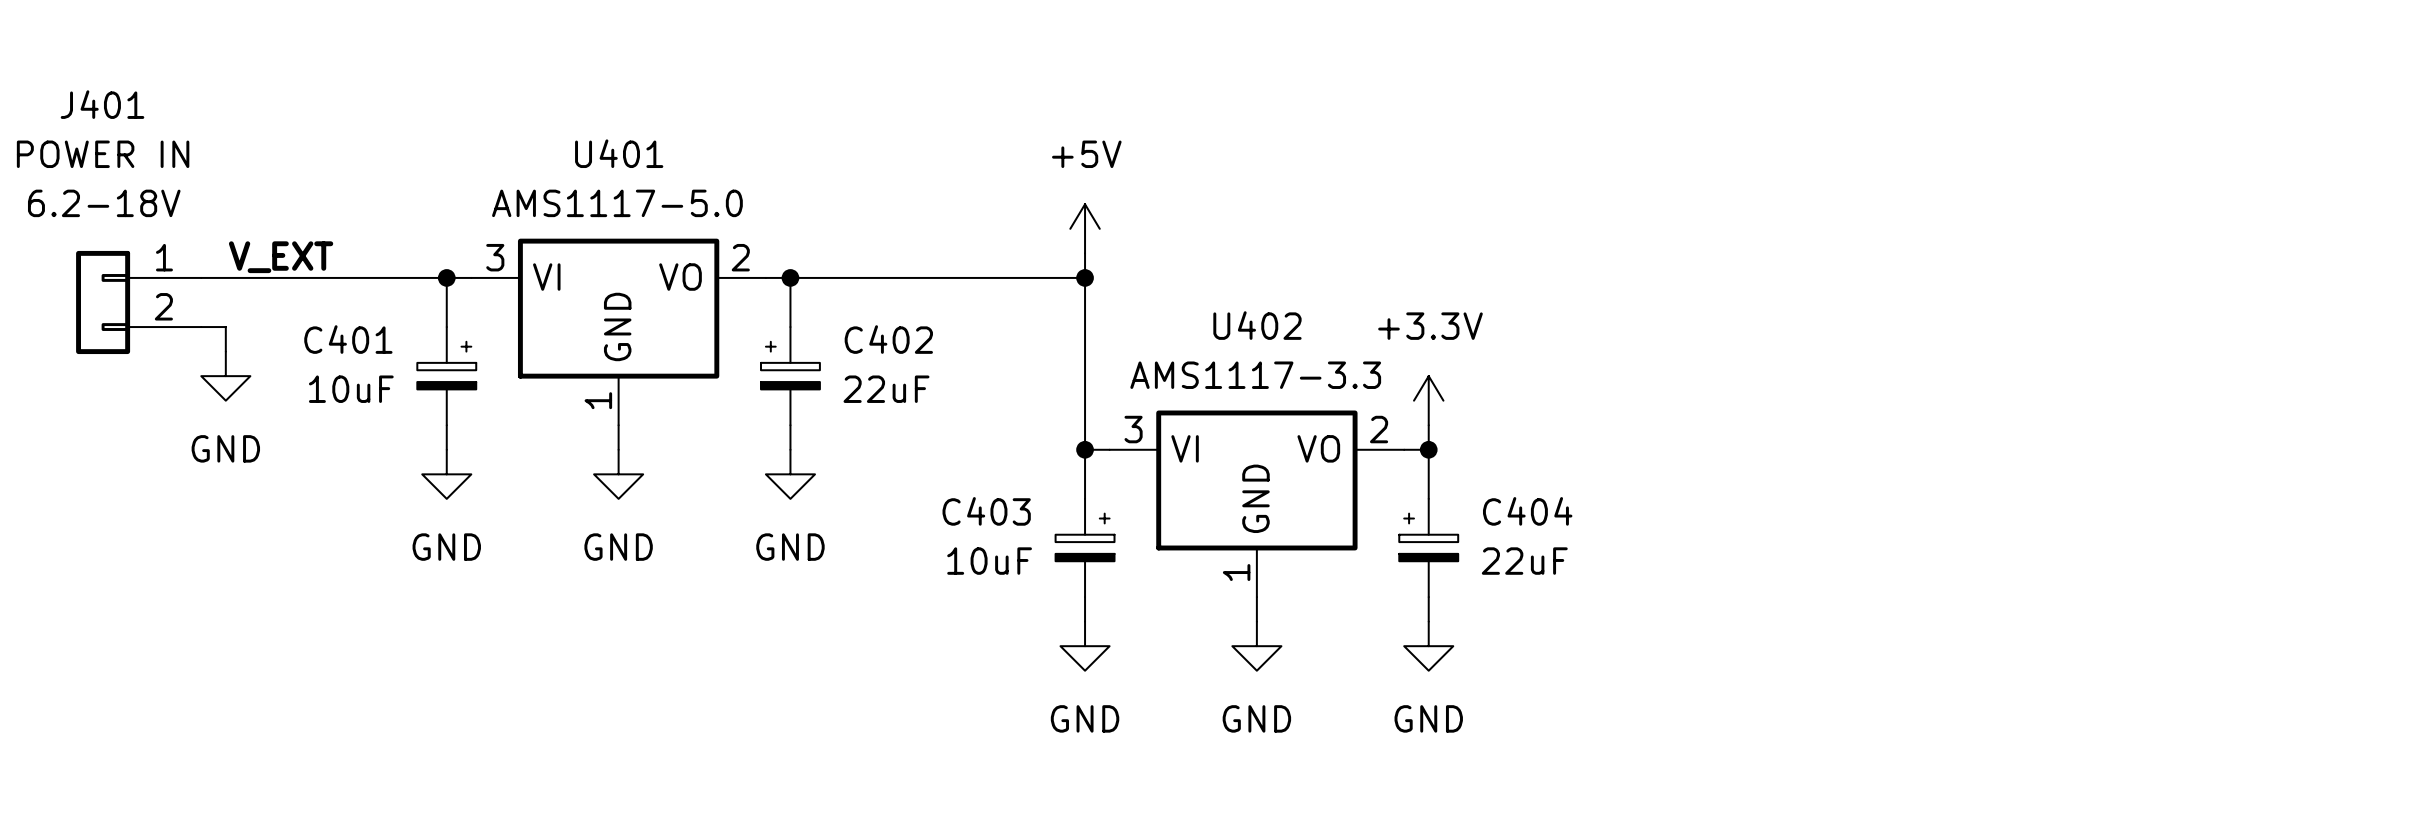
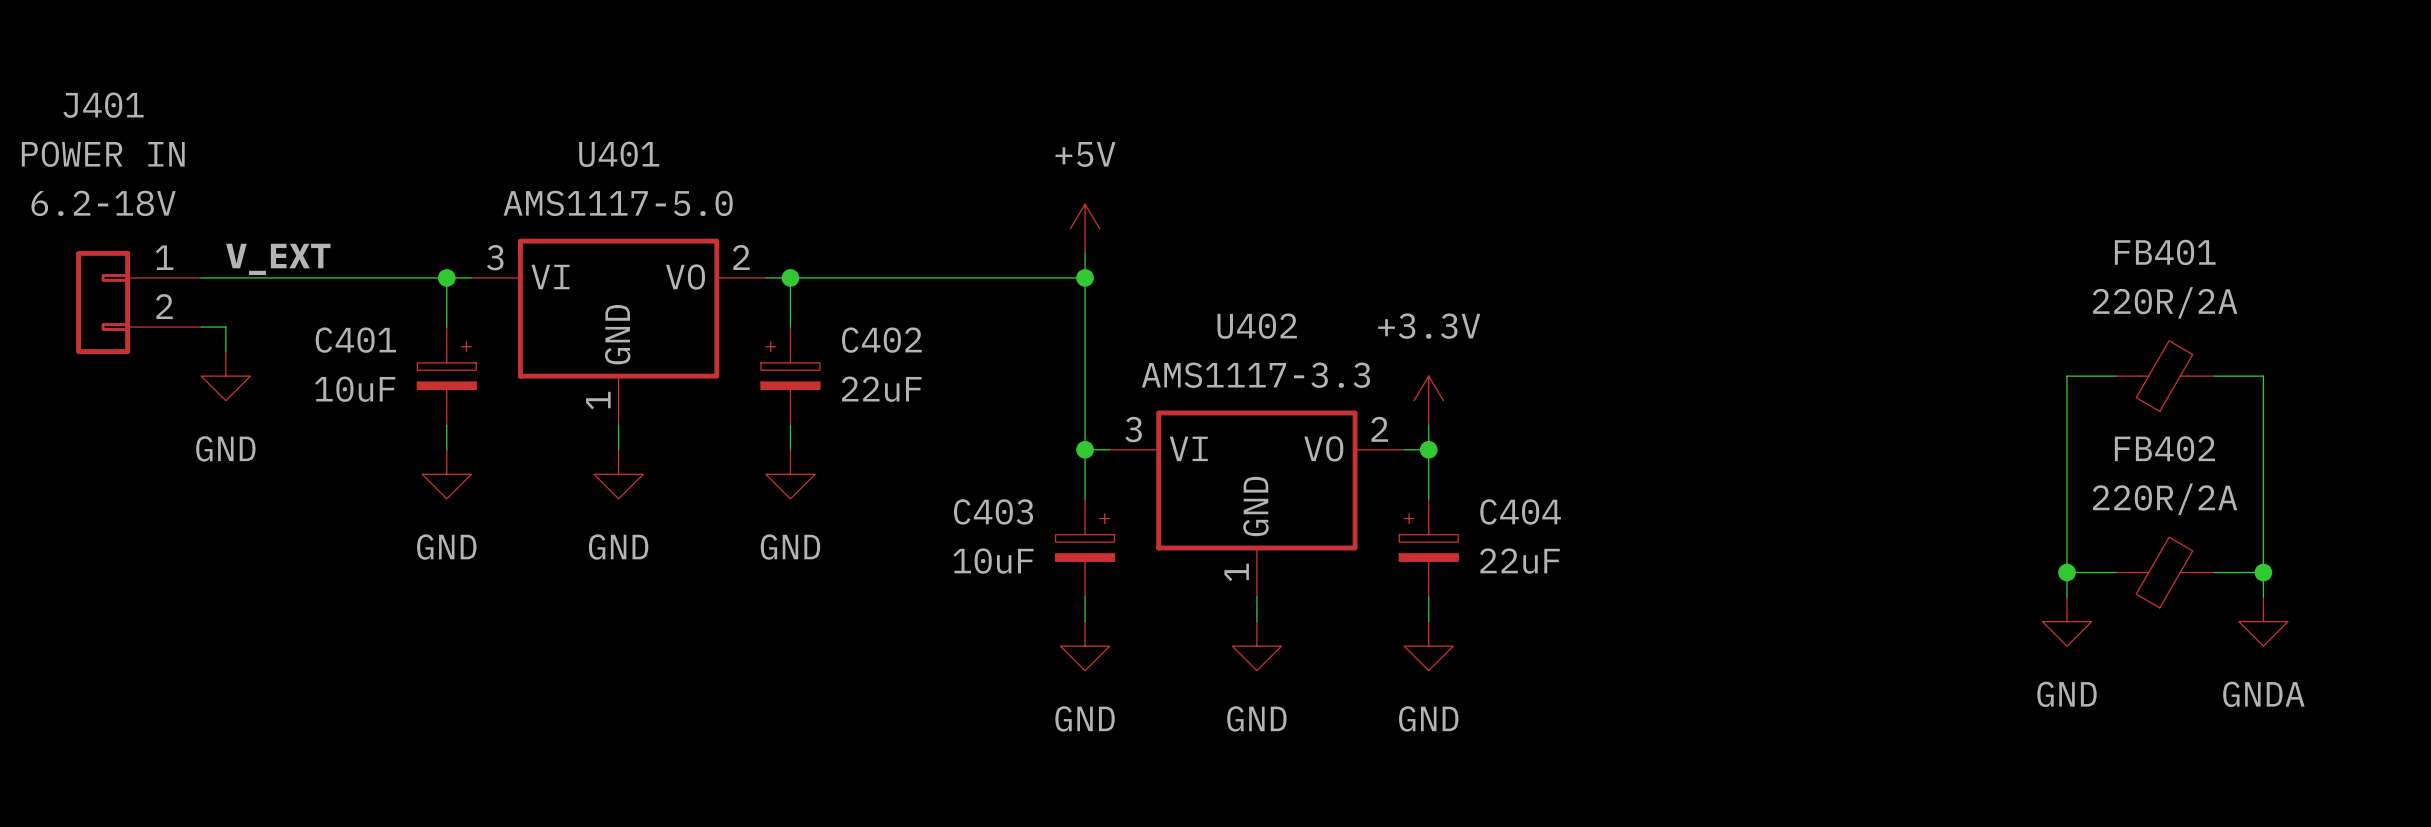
wire: none -> (2116, 376) (2067, 376) (2067, 597)
FB401: none -> 220R/2A (2165, 376)
wire: none -> (2214, 376) (2263, 376) (2263, 597)
wire: none -> (2067, 572) (2116, 572)
junction: none -> (2067, 572)
FB402: none -> 220R/2A (2165, 572)
wire: none -> (2214, 572) (2263, 572)
junction: none -> (2263, 572)
power symbol: none -> GND (2067, 621)
power symbol: none -> GNDA (2263, 621)

